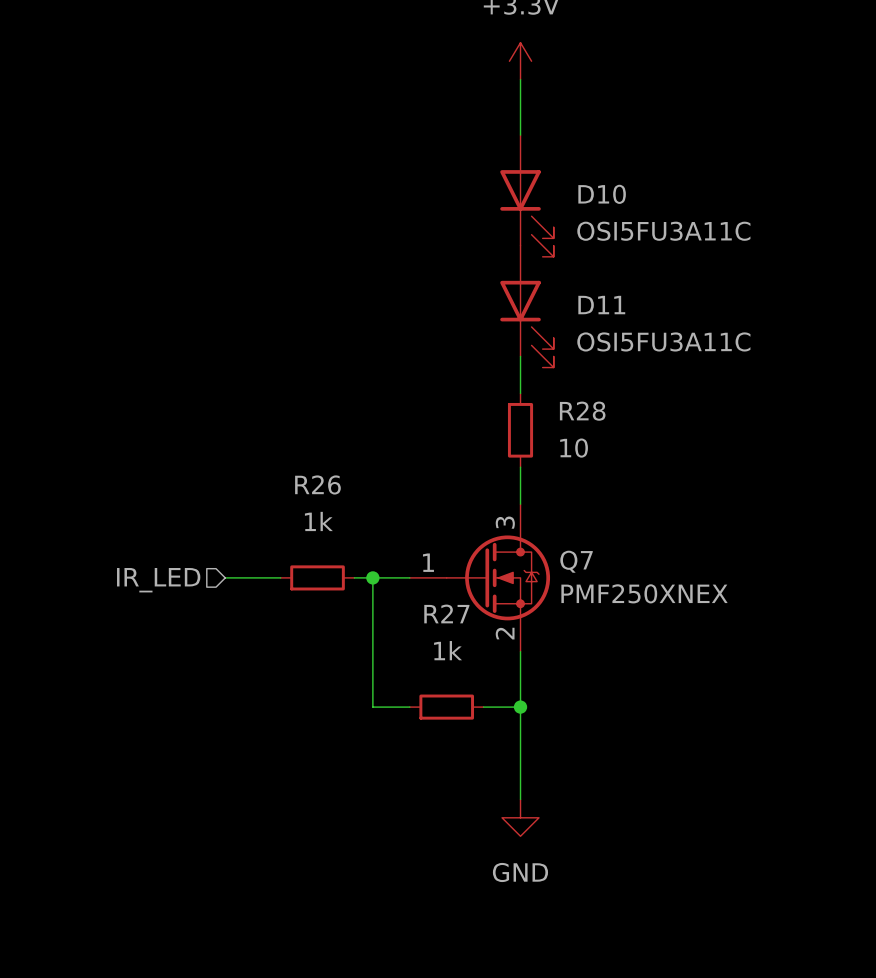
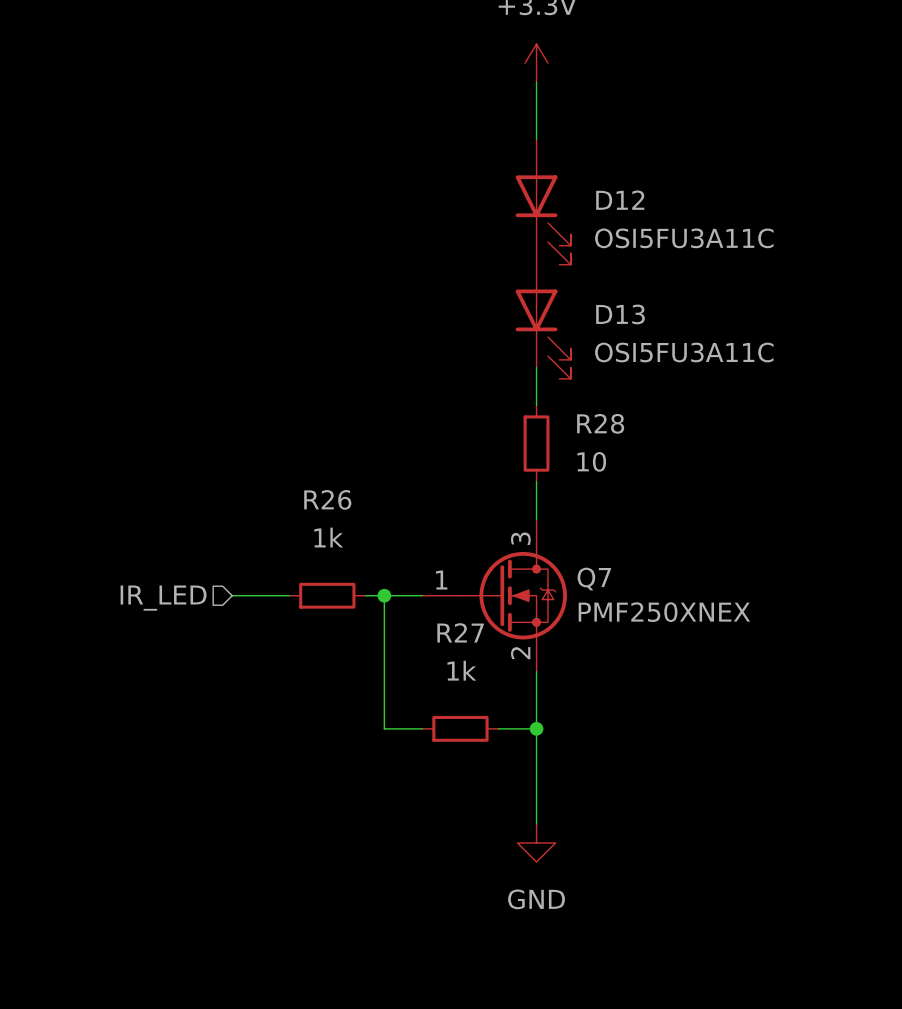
D10 name: D10 (602, 194) -> D12 (620, 200)
D11 name: D11 (601, 305) -> D13 (620, 314)

